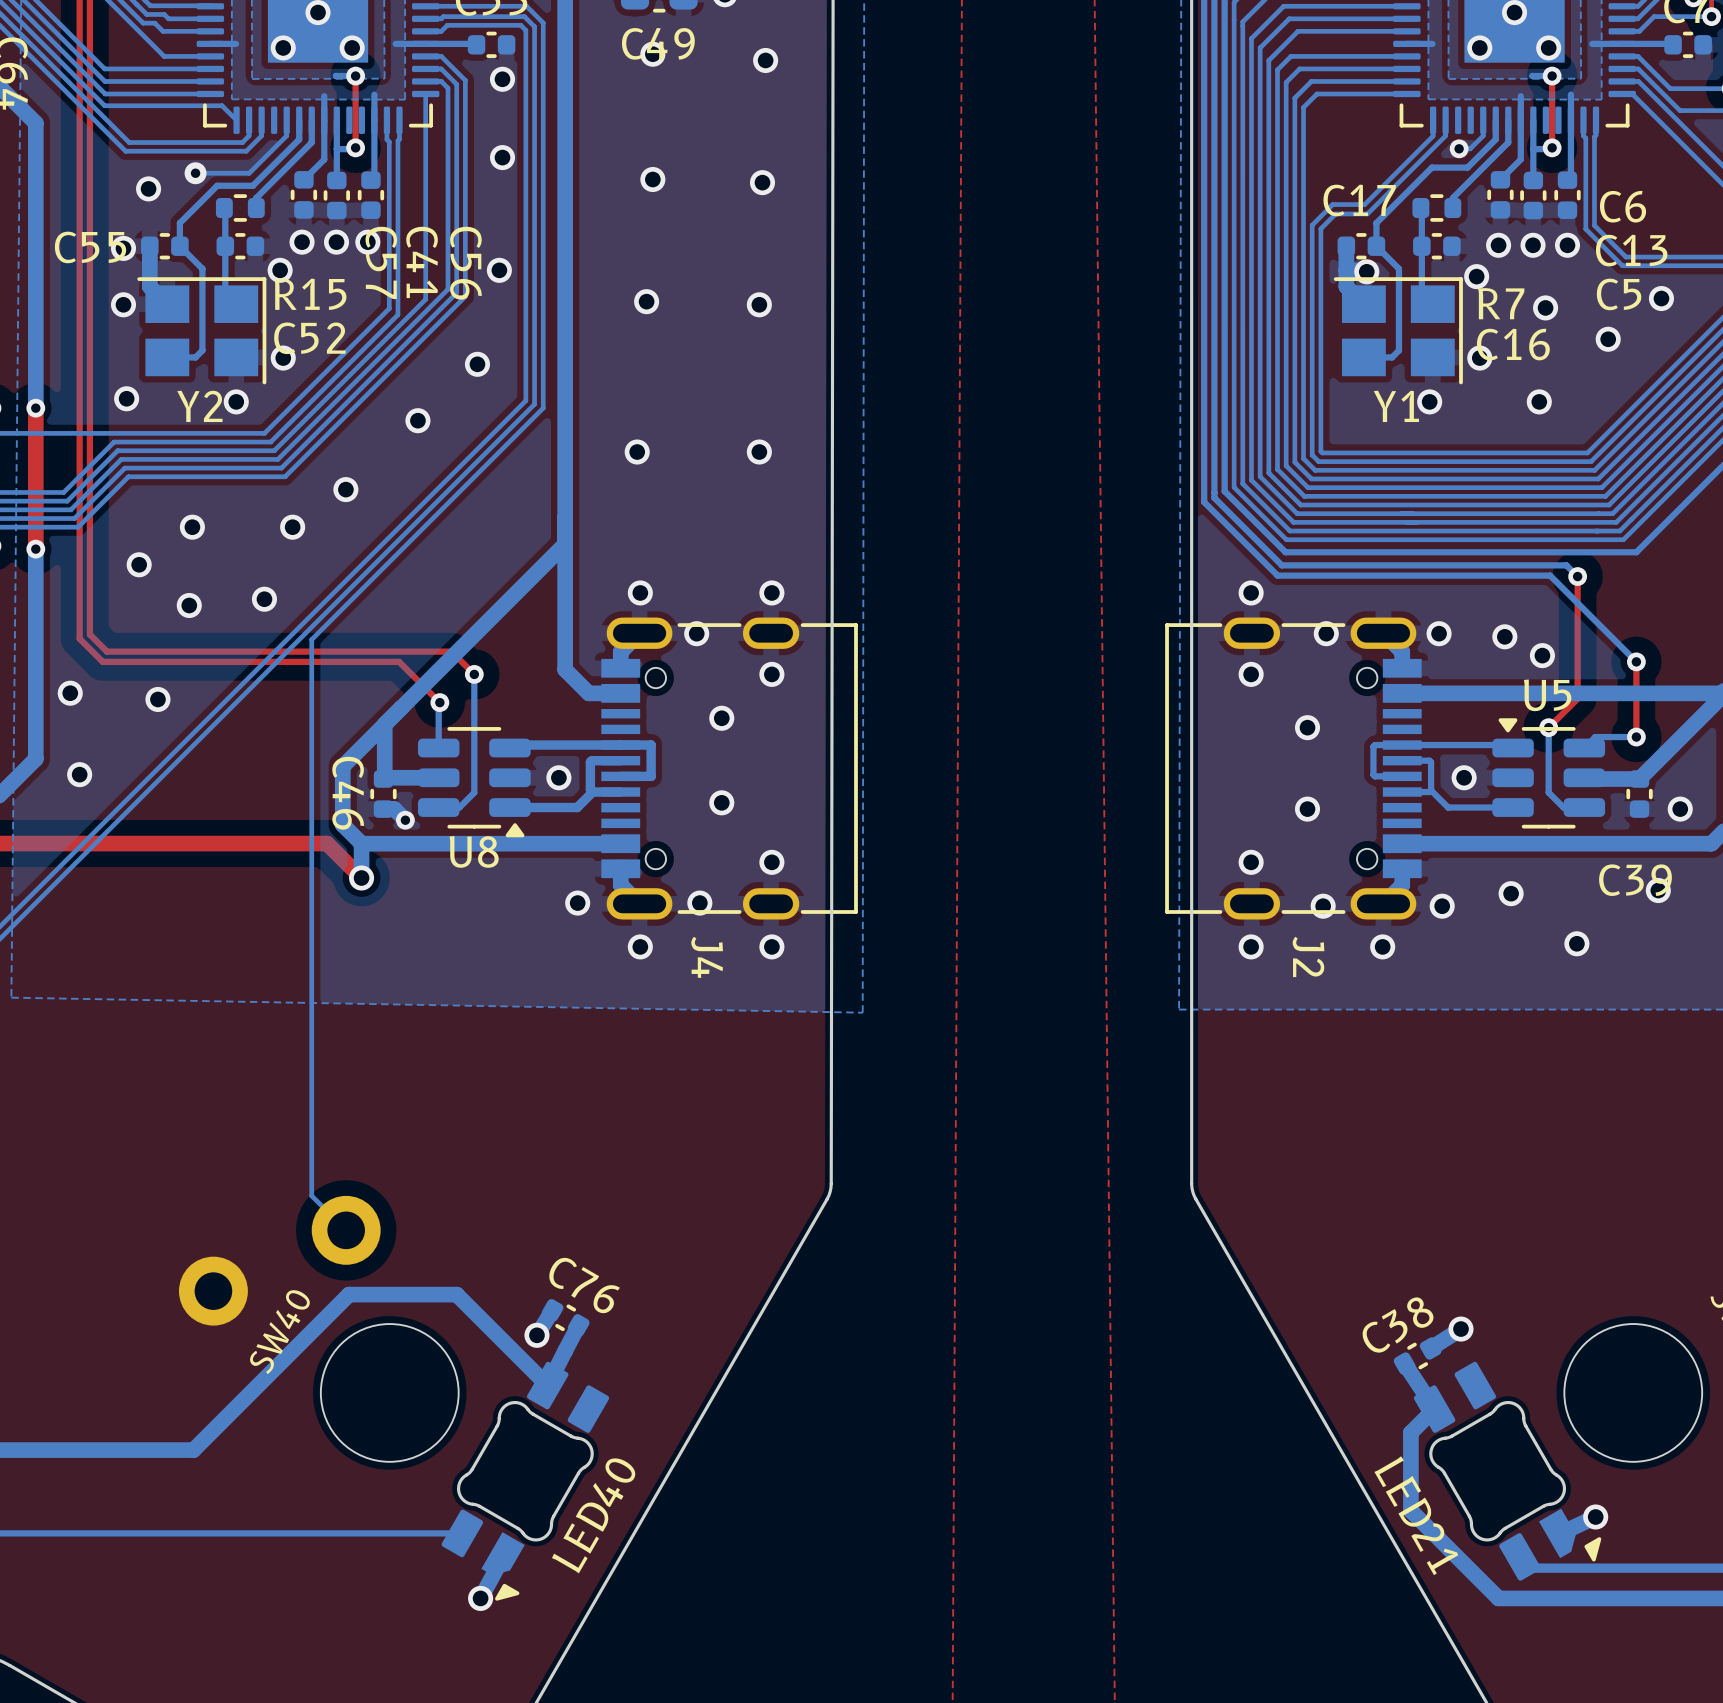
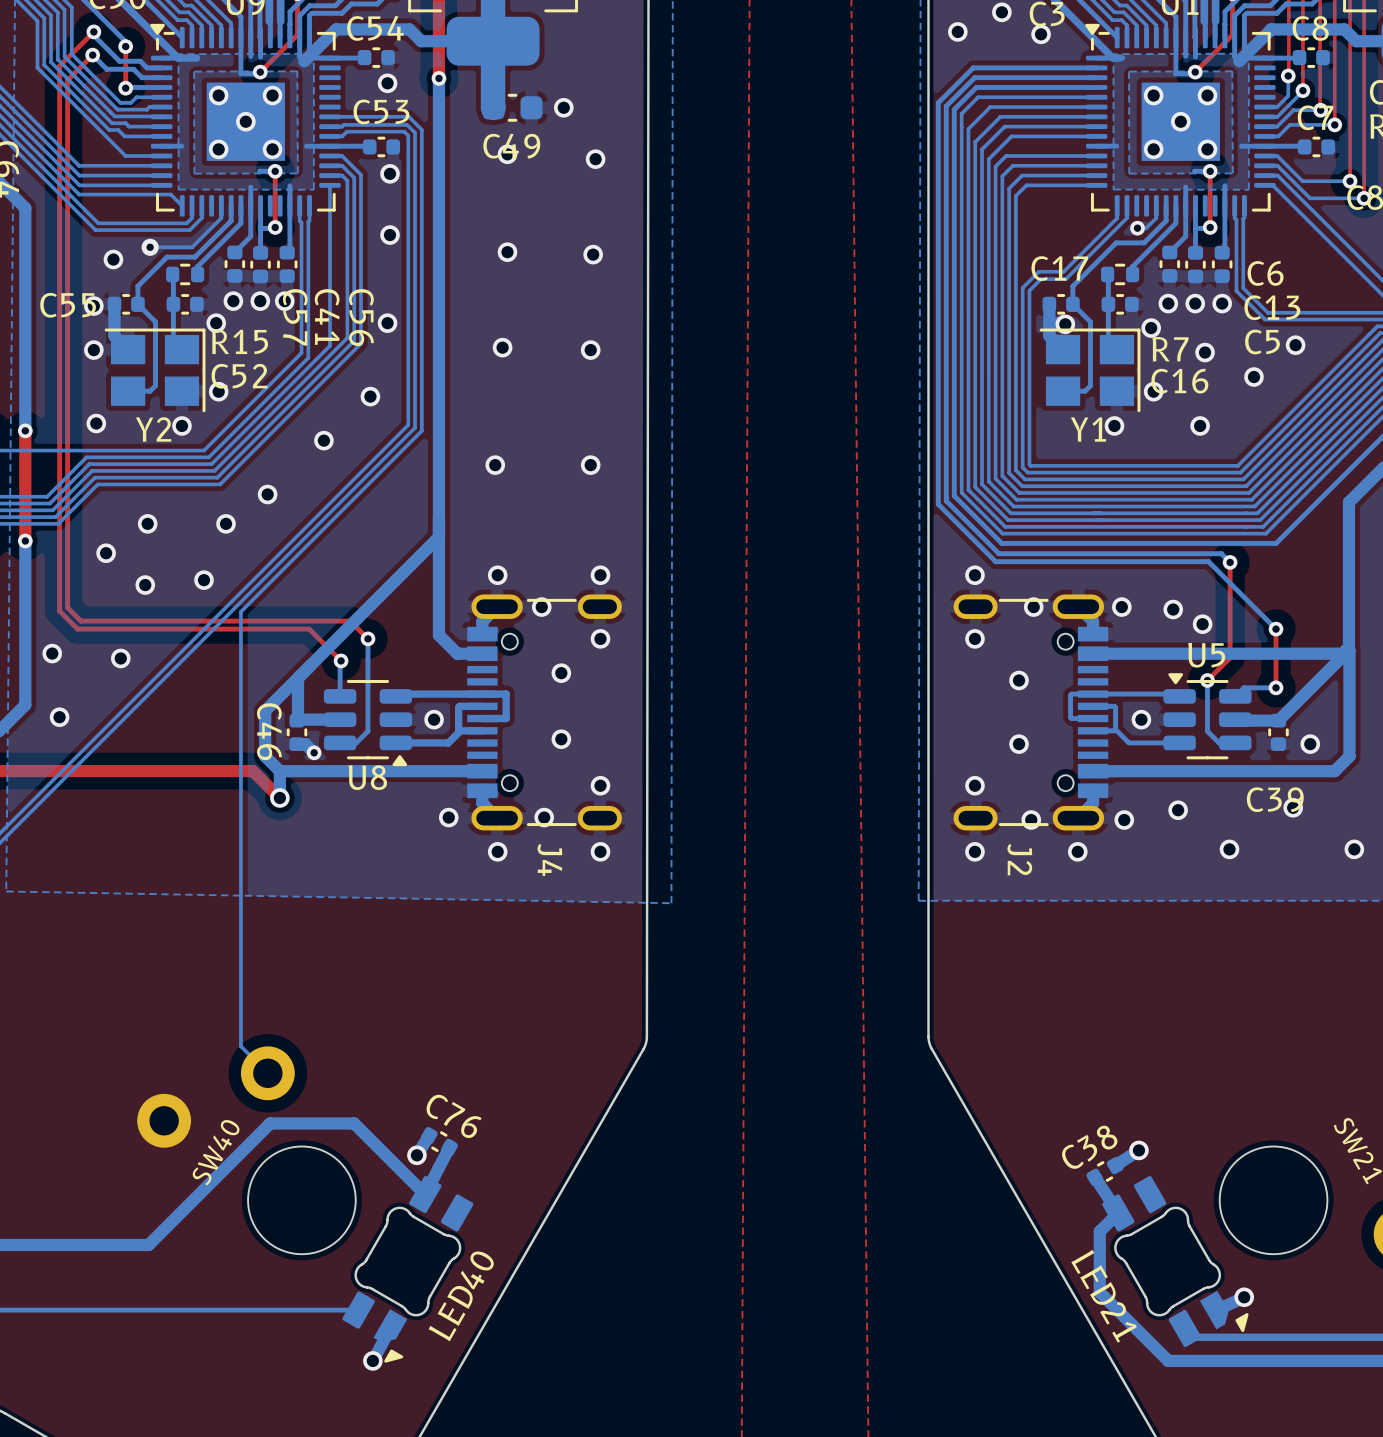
J4 footprint: [601, 617, 858, 920] -> [467, 594, 622, 831]
J2 footprint: [1165, 617, 1422, 920] -> [953, 594, 1109, 831]

